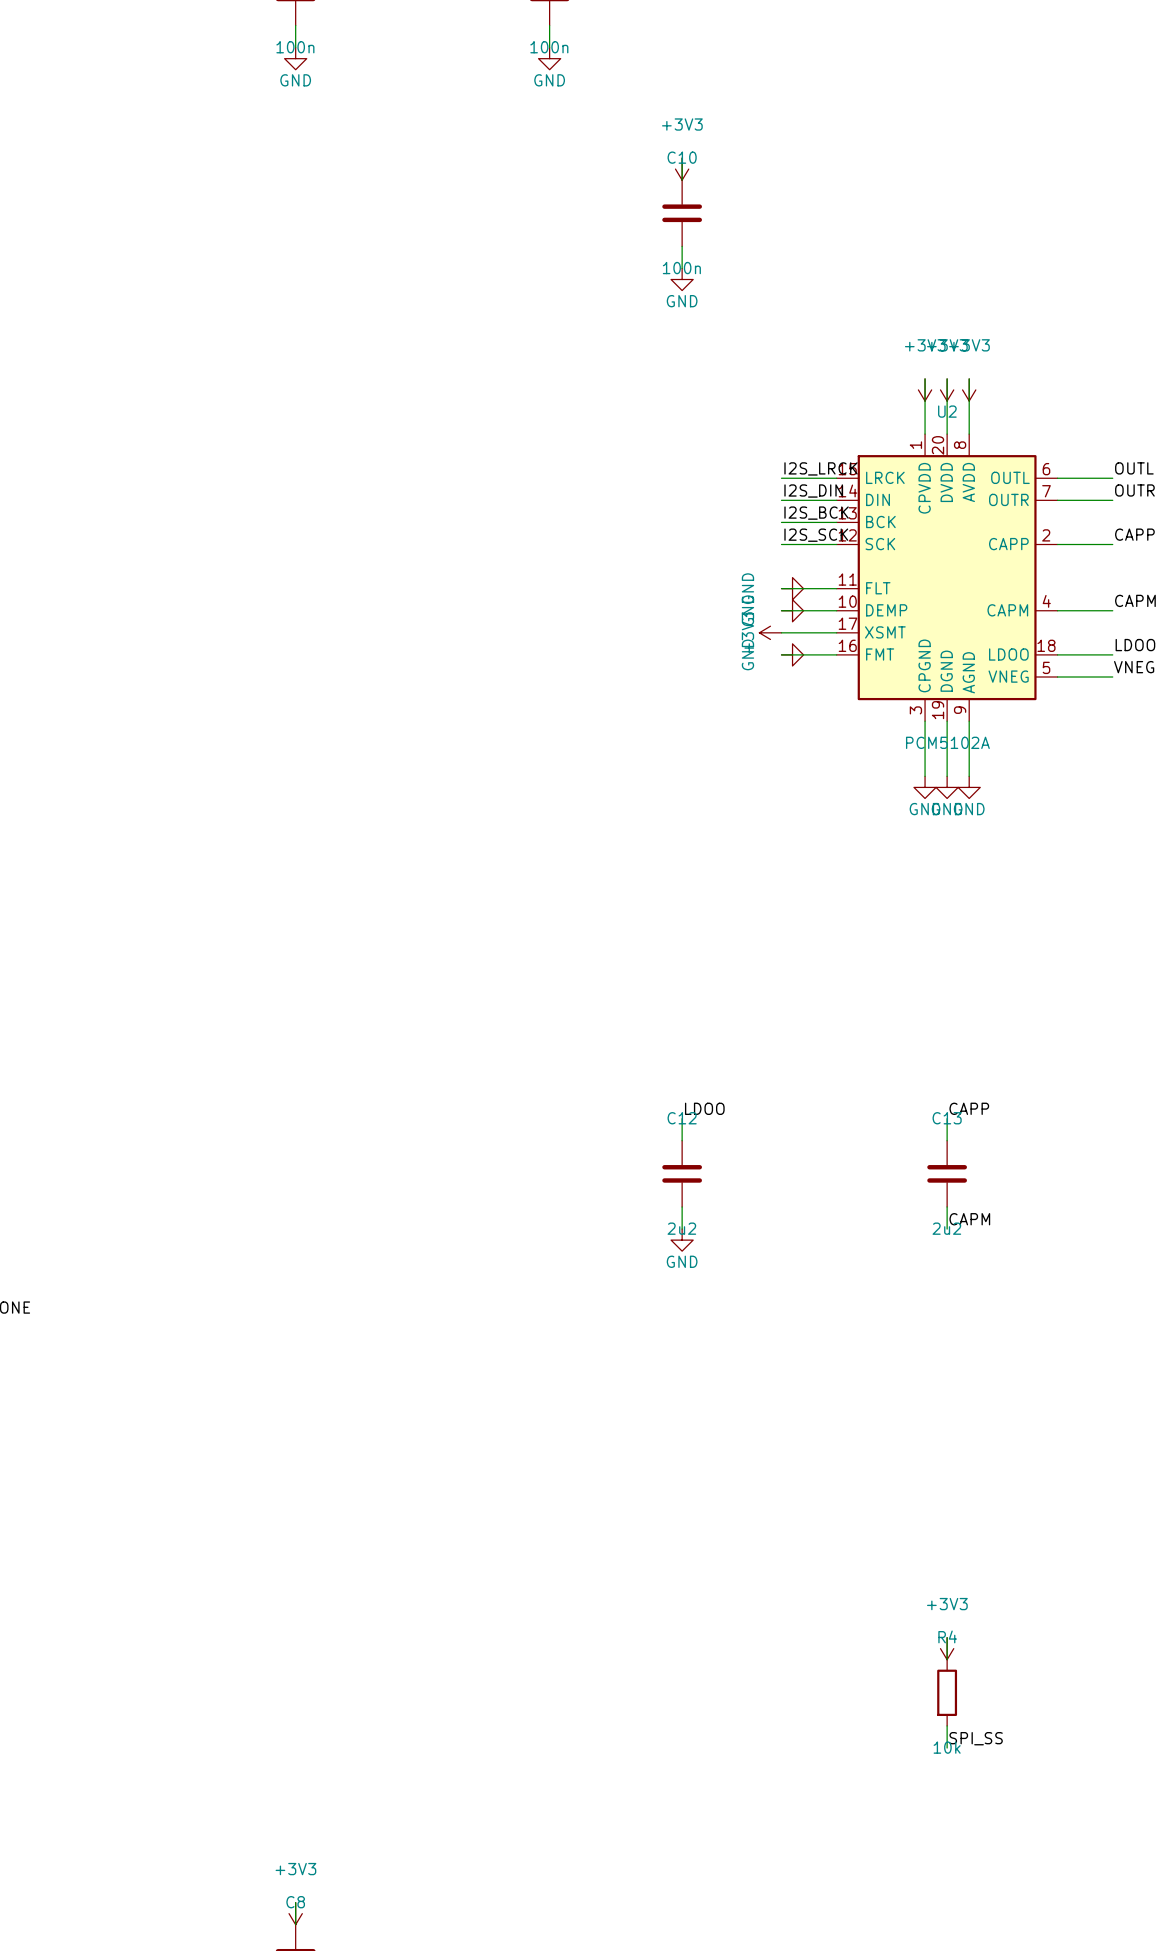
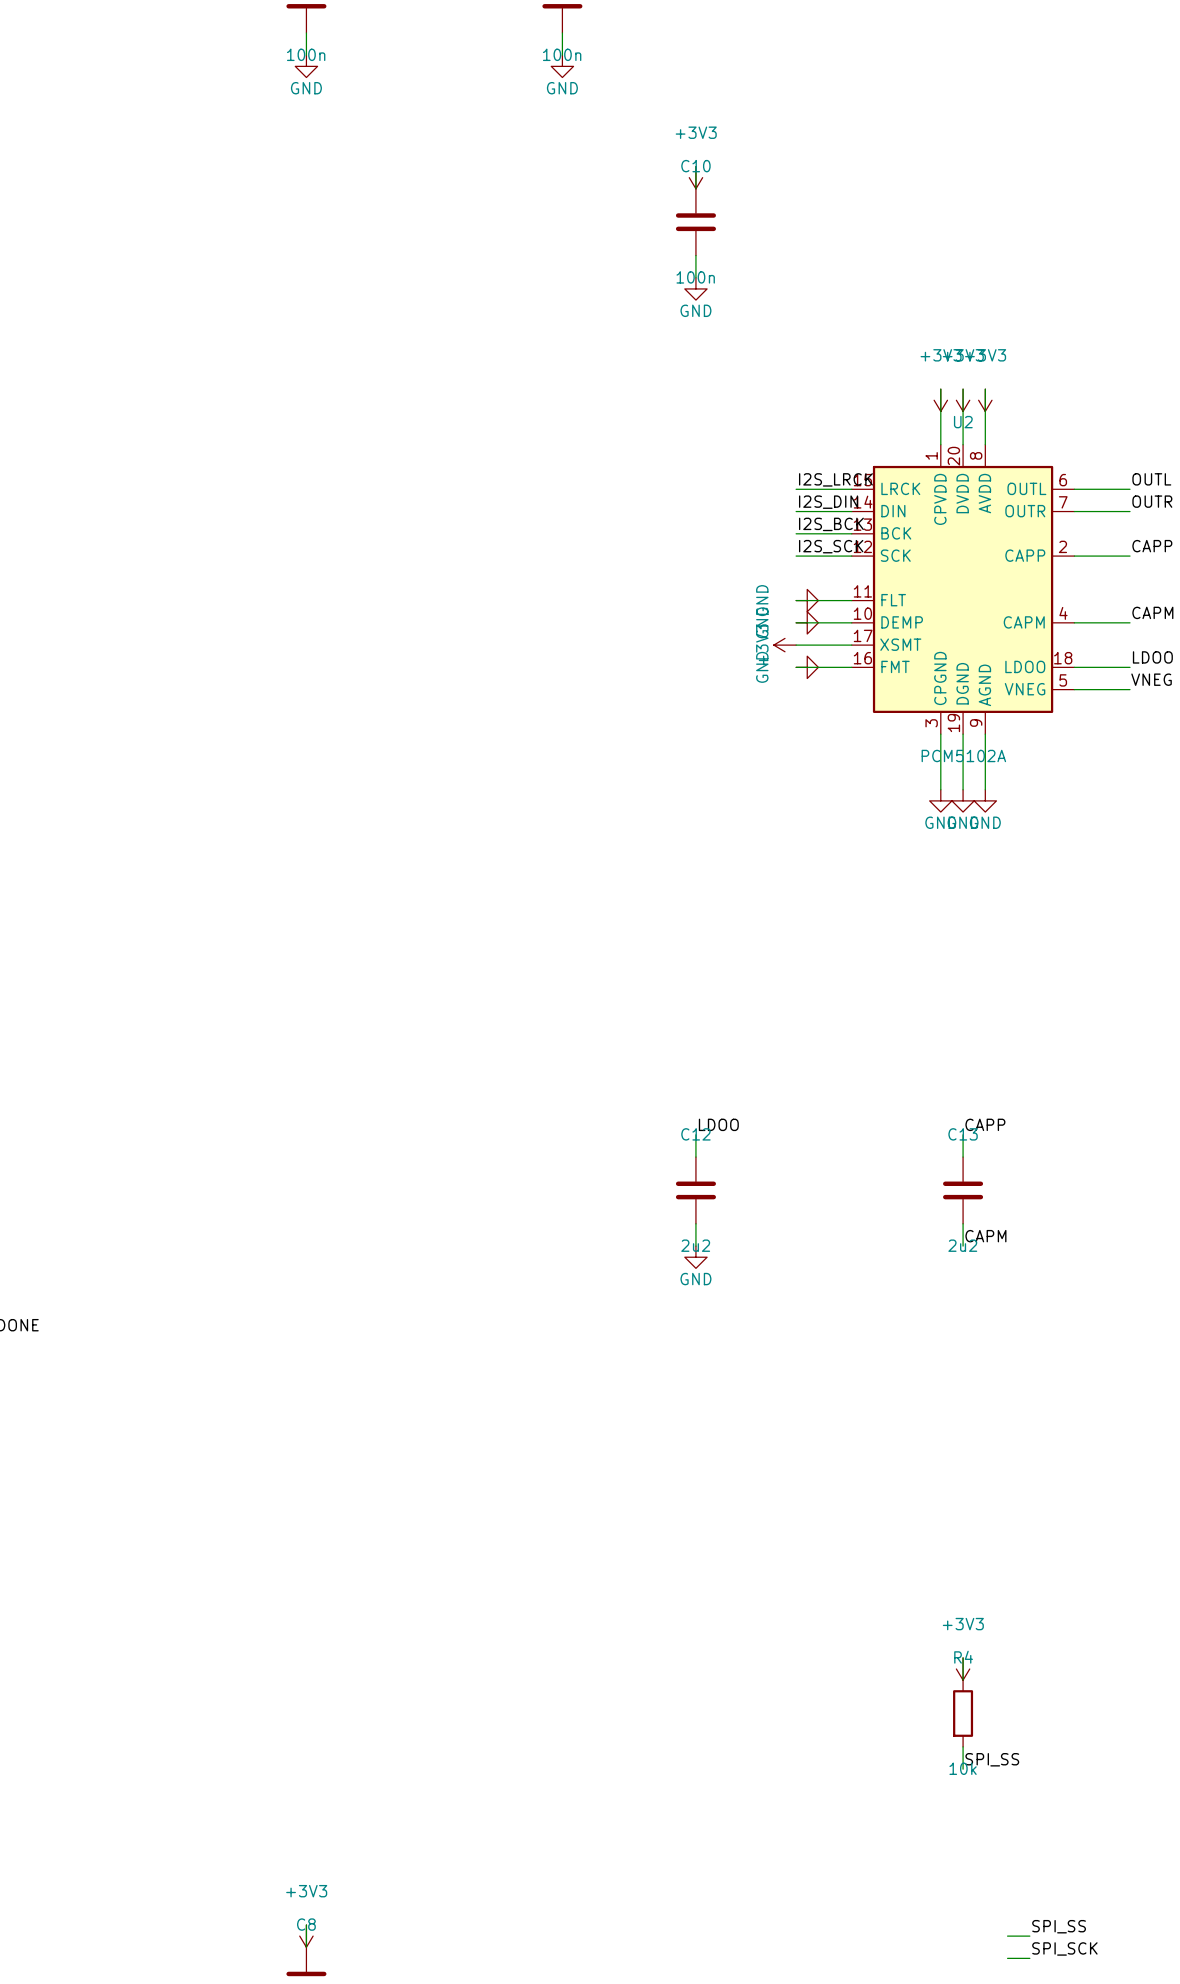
label: none -> SPI_SS (1059, 1926)
wire: none -> (1007, 1936) (1029, 1936)
label: none -> SPI_SCK (1064, 1948)
wire: none -> (1007, 1958) (1029, 1958)

